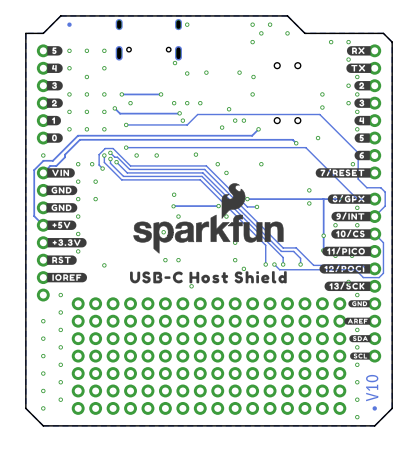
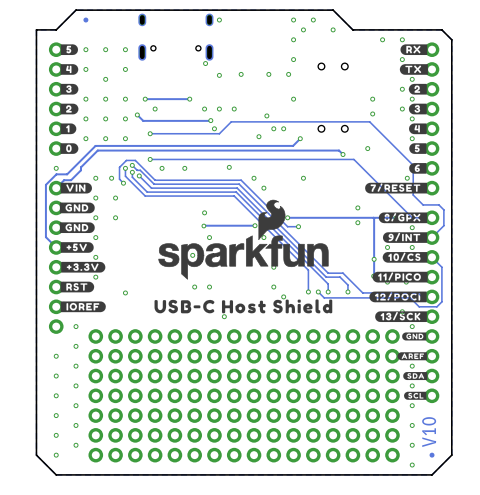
via: none -> (293, 59)
via: none -> (268, 74)
via: (239, 72) -> none
via: none -> (288, 74)
via: (253, 77) -> none

